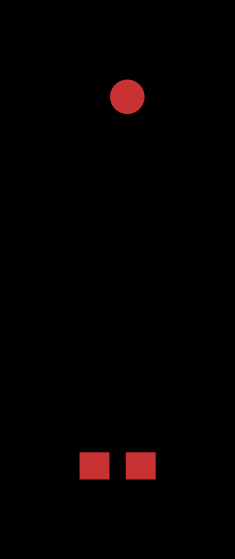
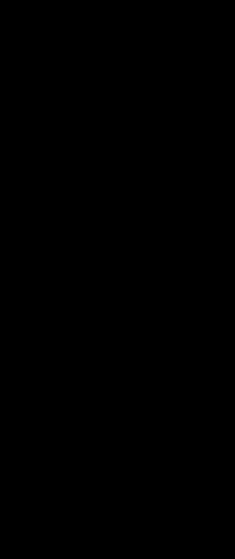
part: (127, 96) -> none
part: (117, 465) -> none

